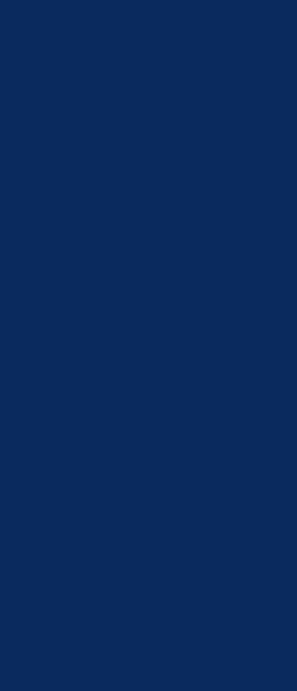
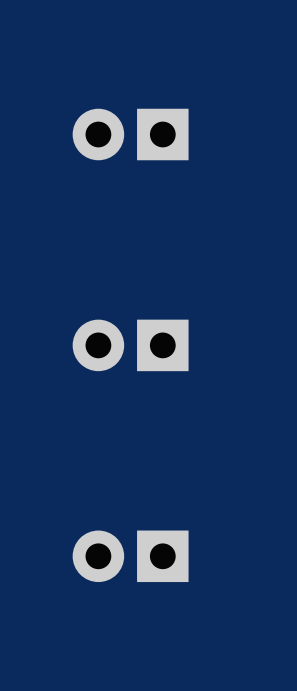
part: none -> (130, 134)
part: none -> (130, 345)
part: none -> (130, 556)

